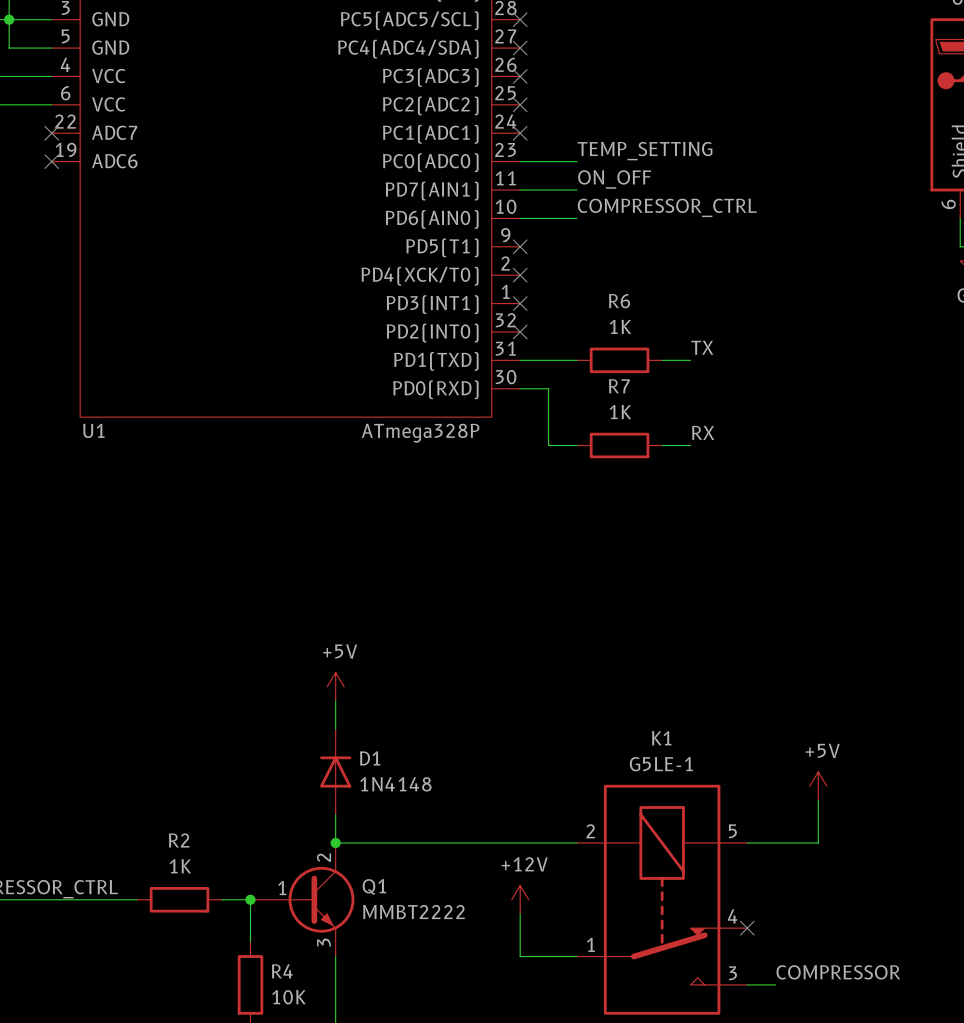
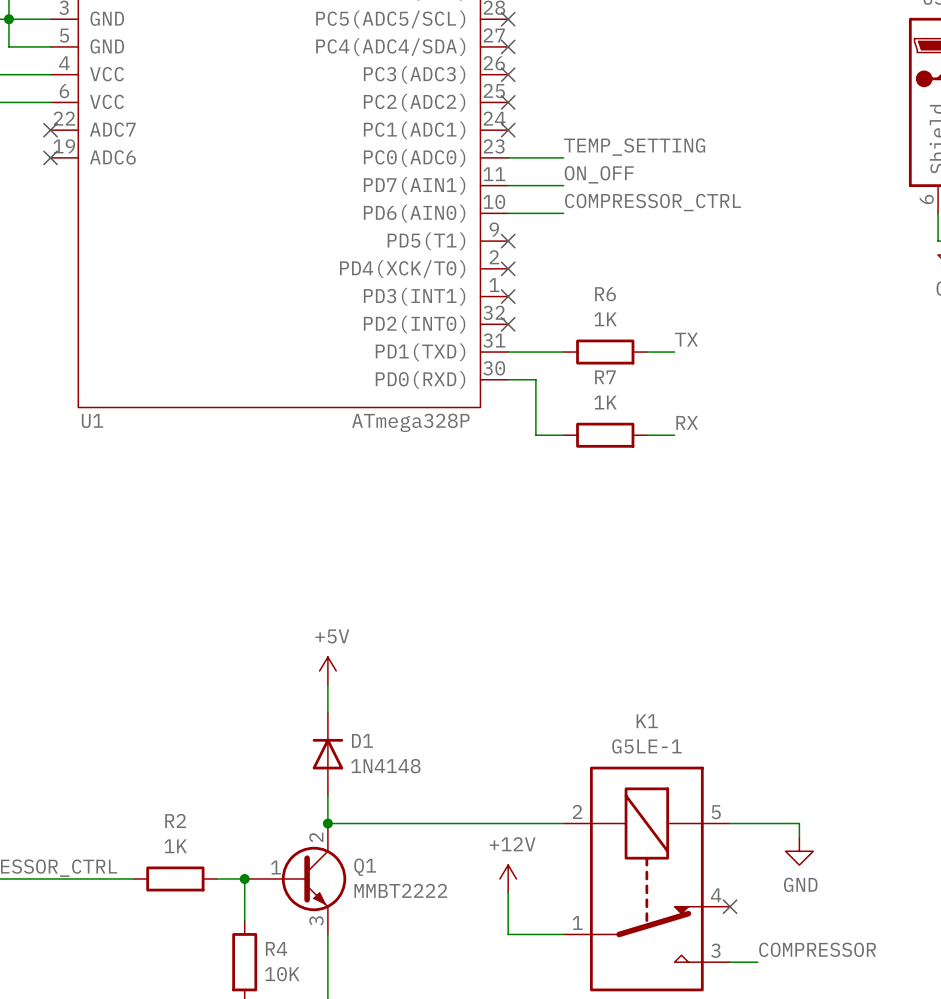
power symbol: +5V (818, 786) -> none
wire: (818, 800) (818, 842) -> (799, 837) (799, 823)
power symbol: none -> GND (799, 851)

